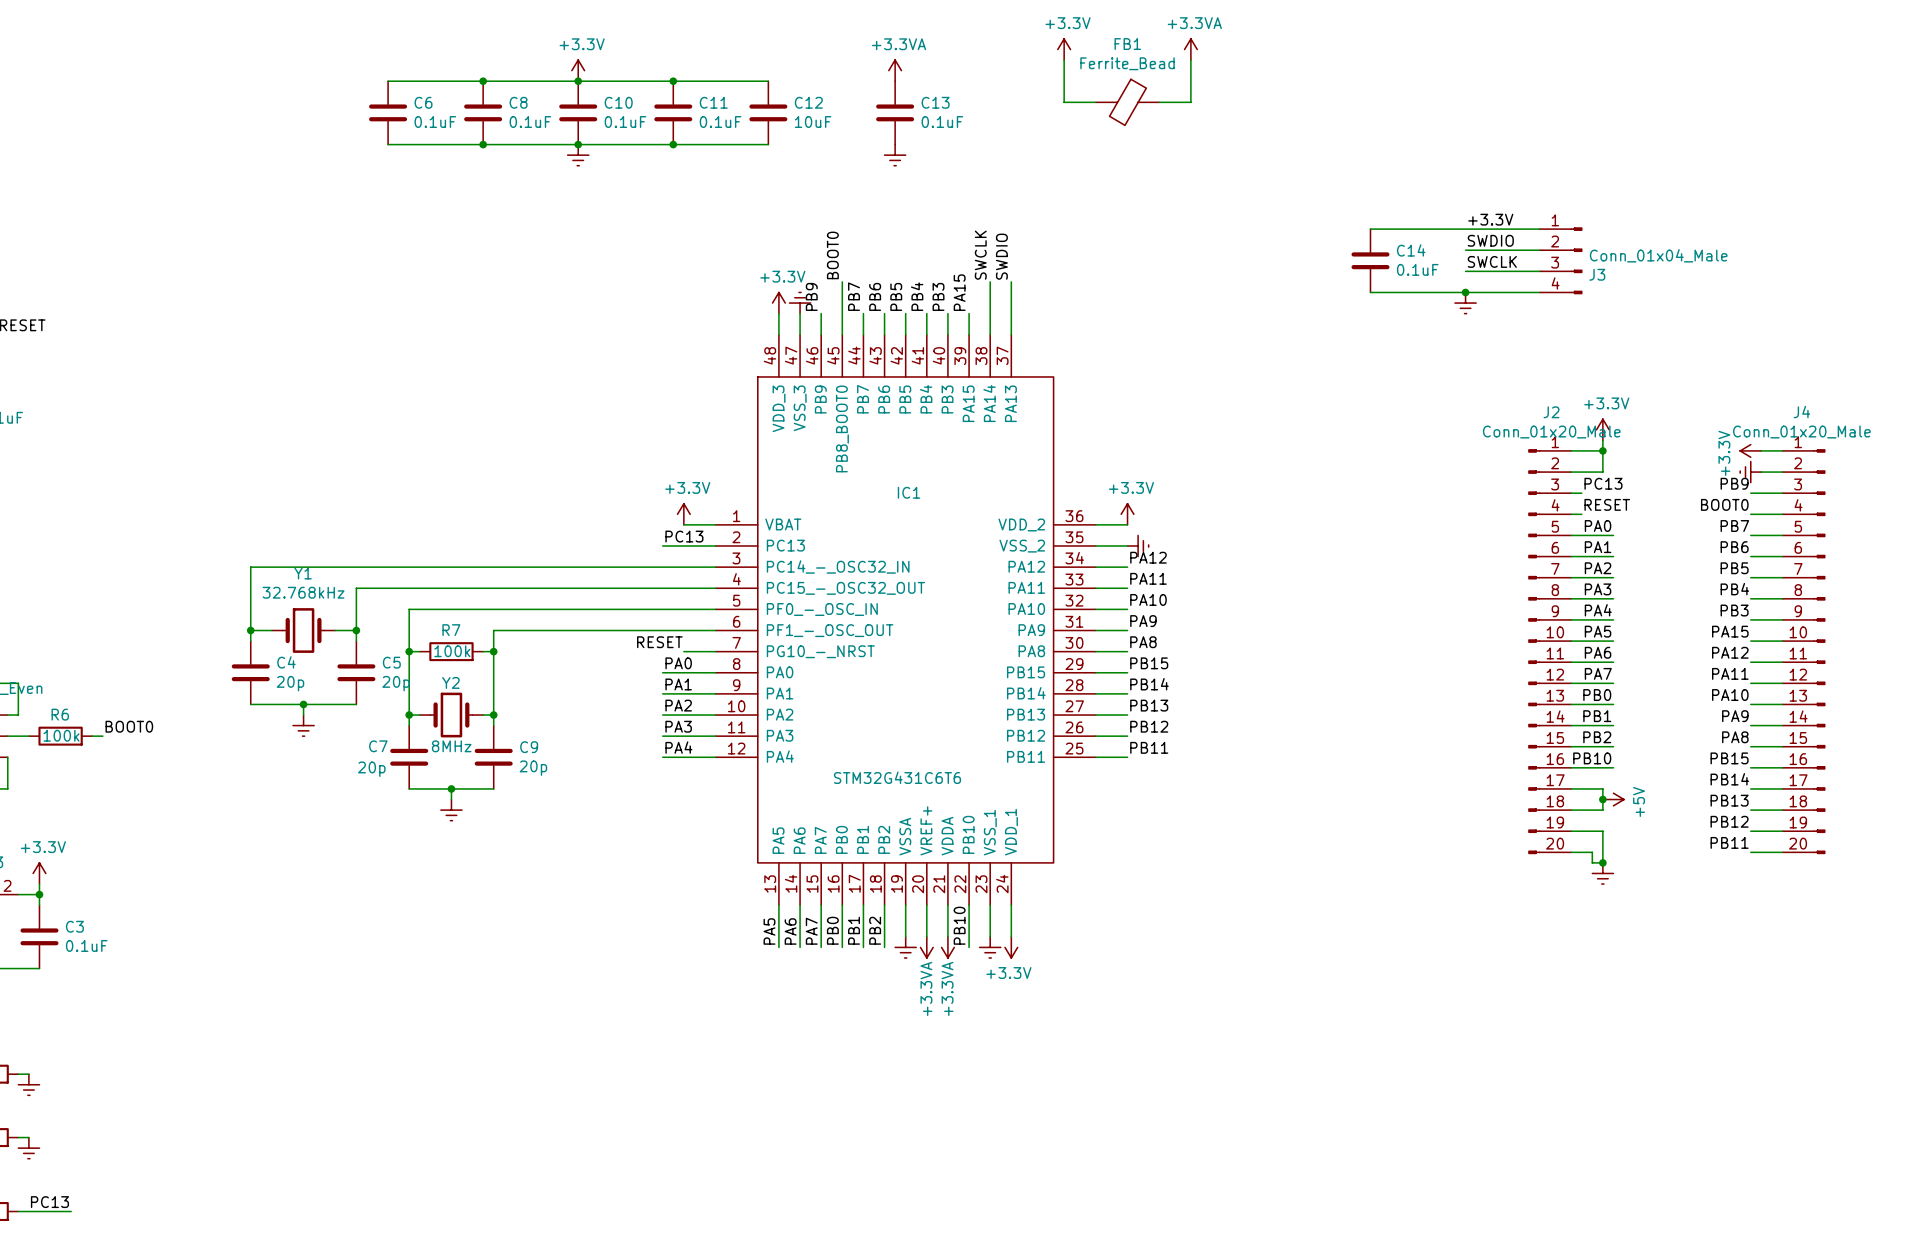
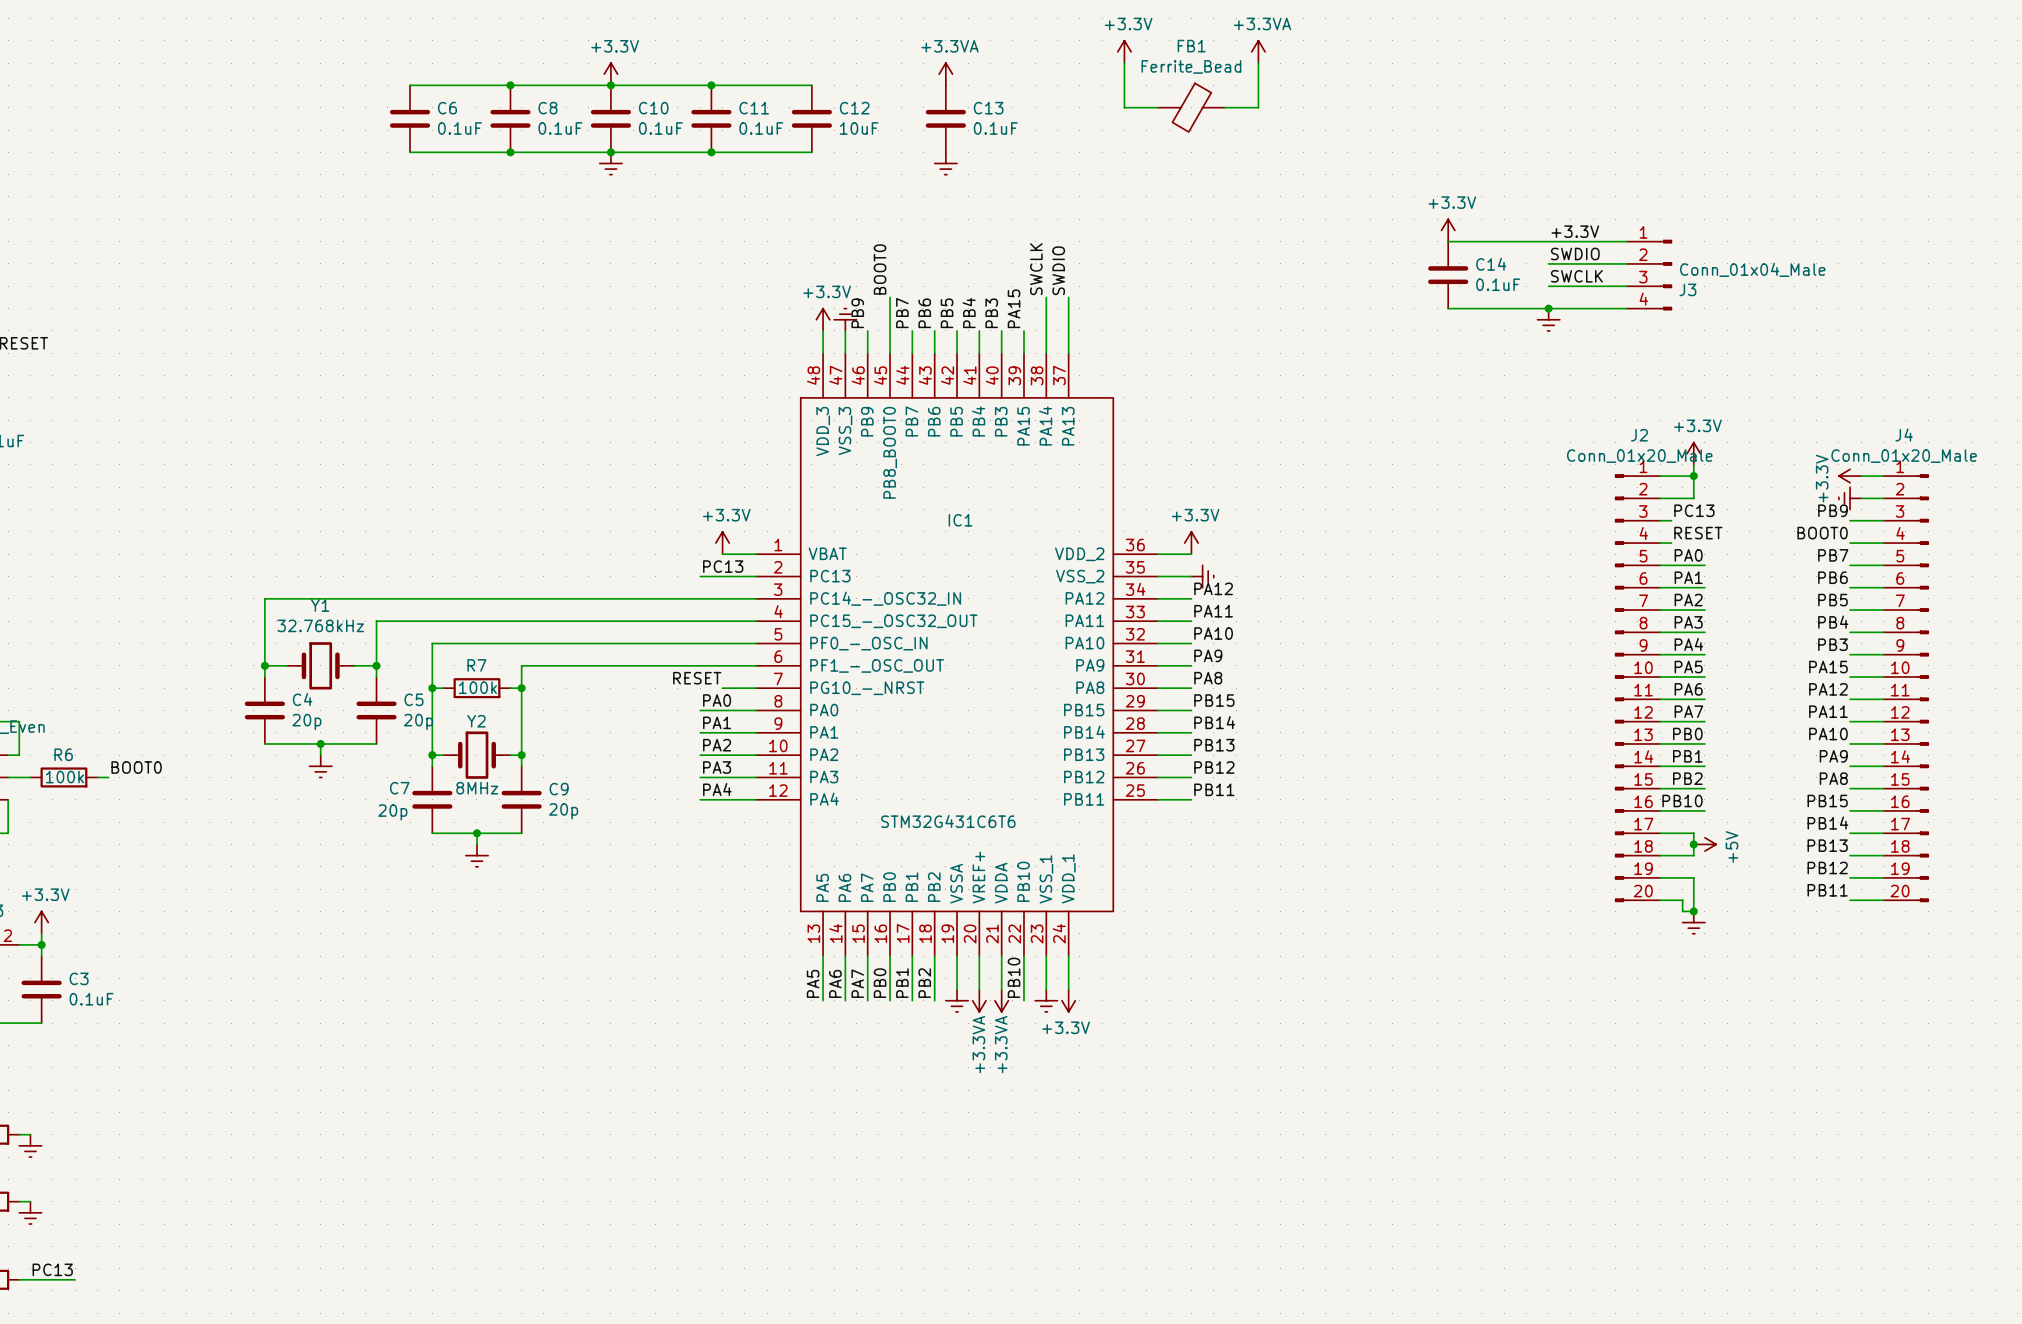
power symbol: none -> +3.3V (1448, 230)

